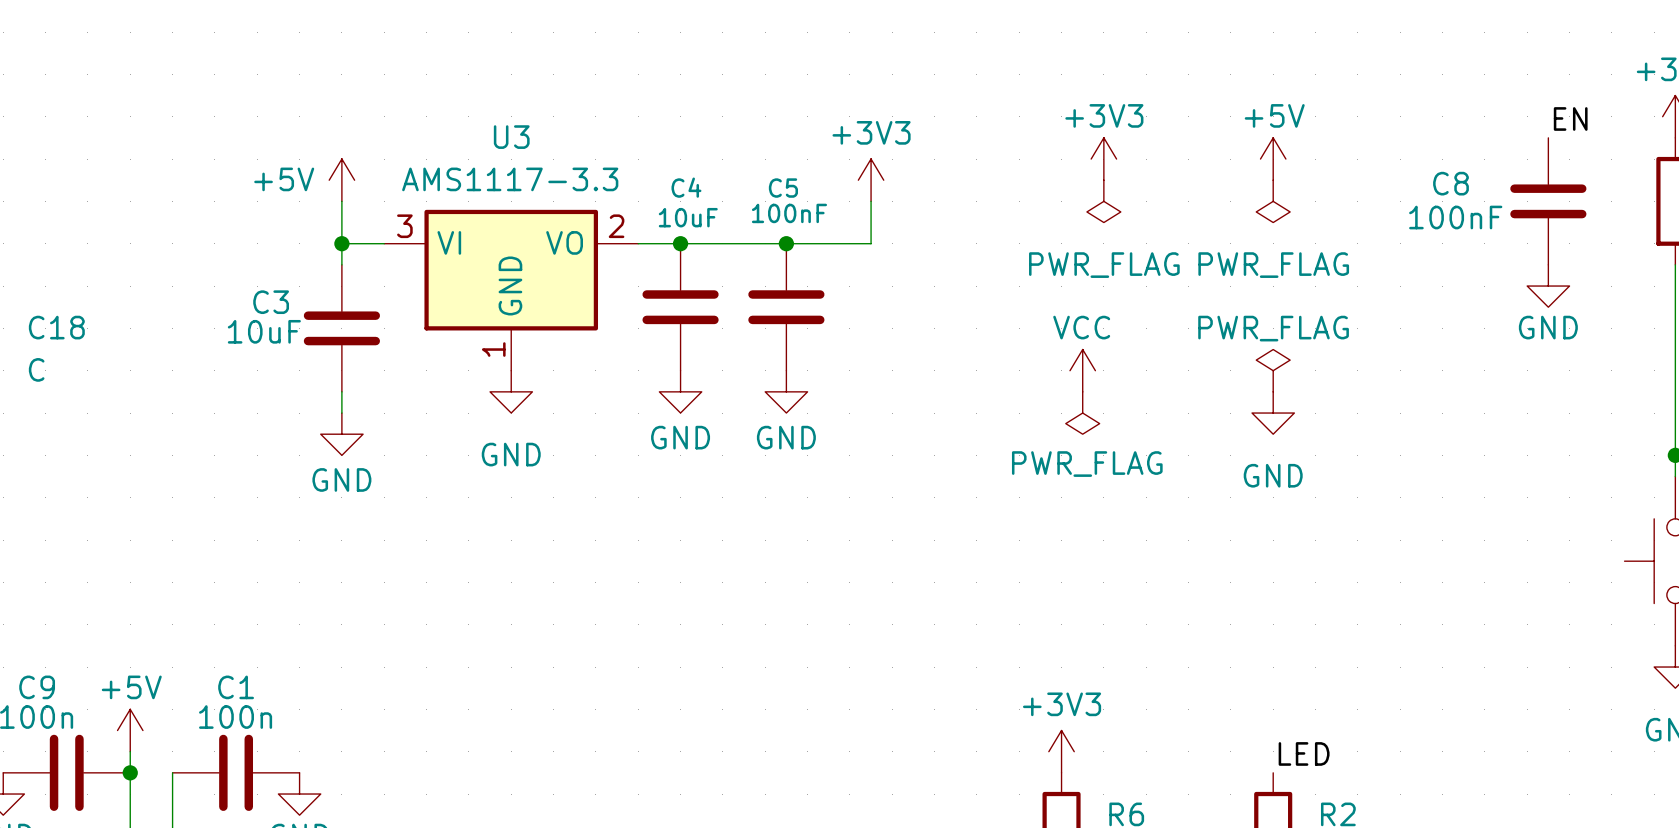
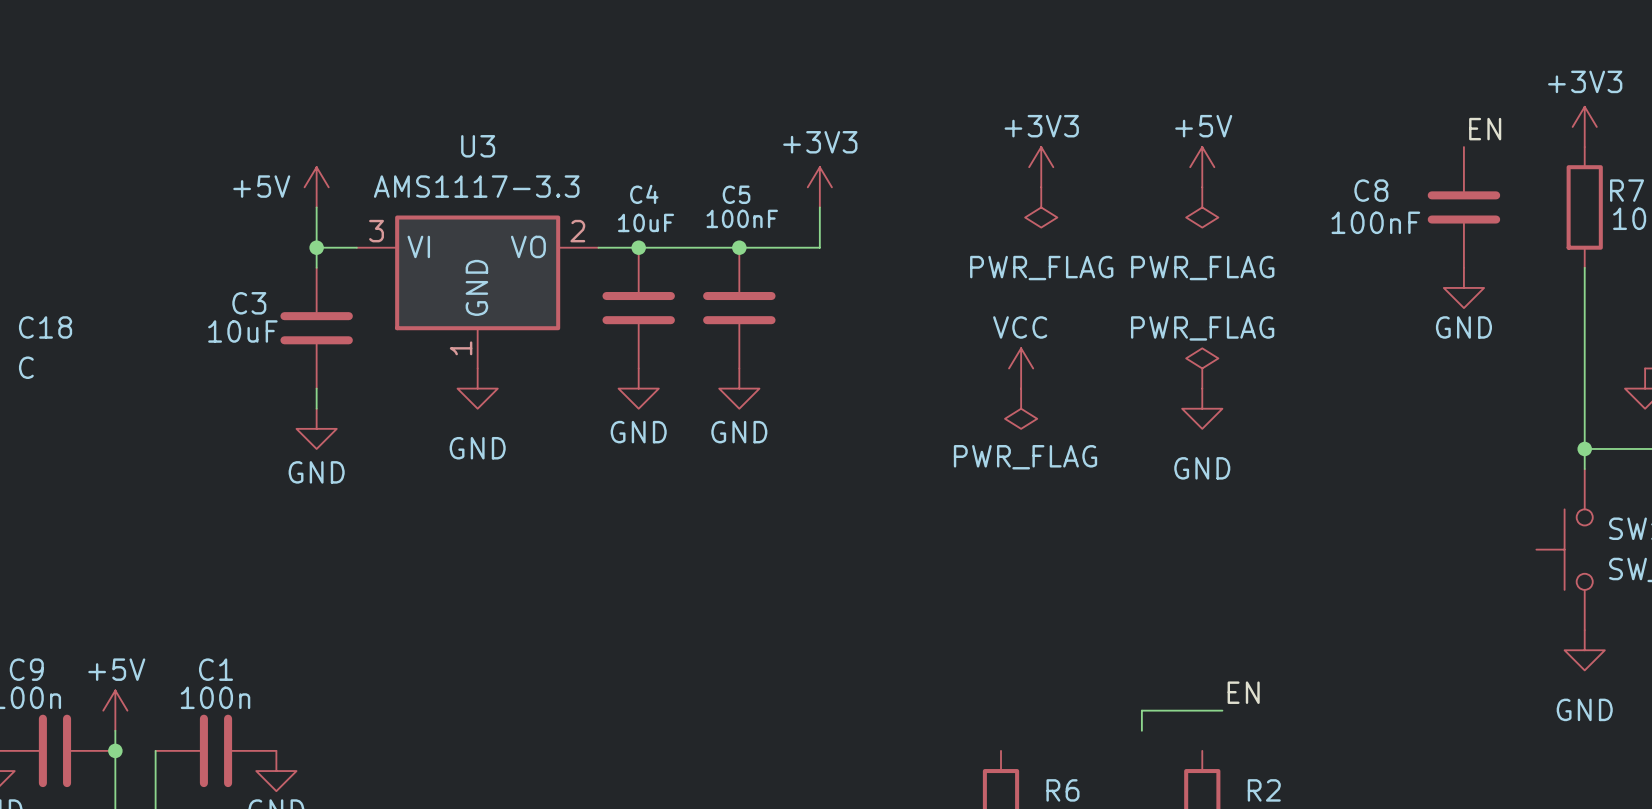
label: none -> EN (1243, 692)
wire: none -> (1222, 710) (1141, 710) (1141, 730)
power symbol: +3V3 (1061, 751) -> none
label: LED (1304, 753) -> none

